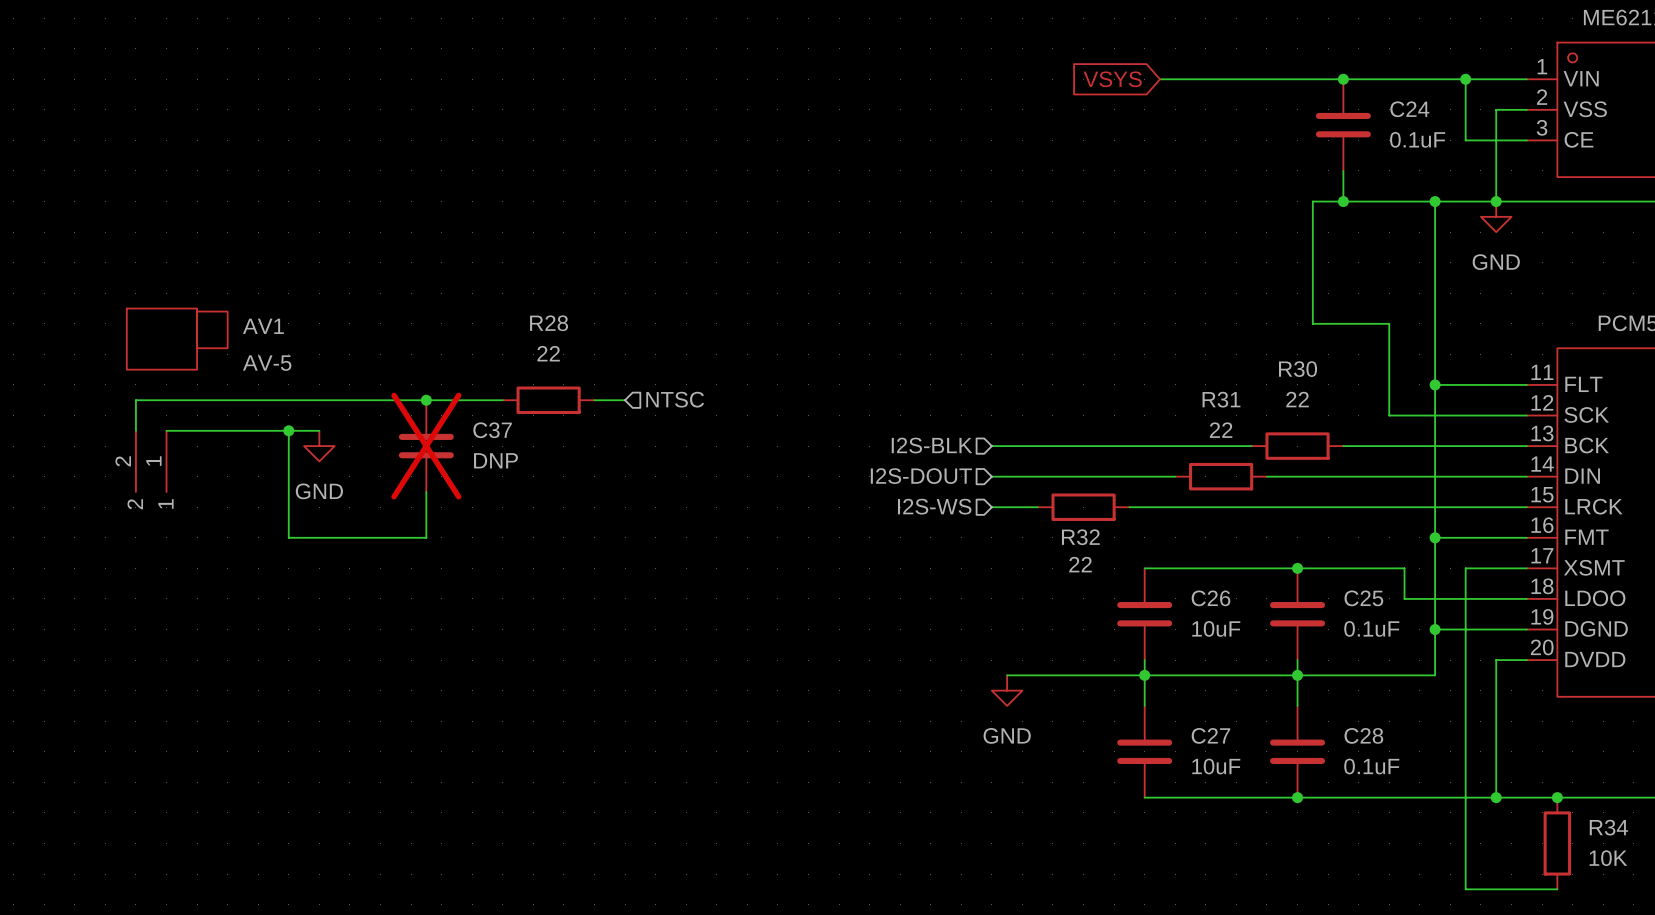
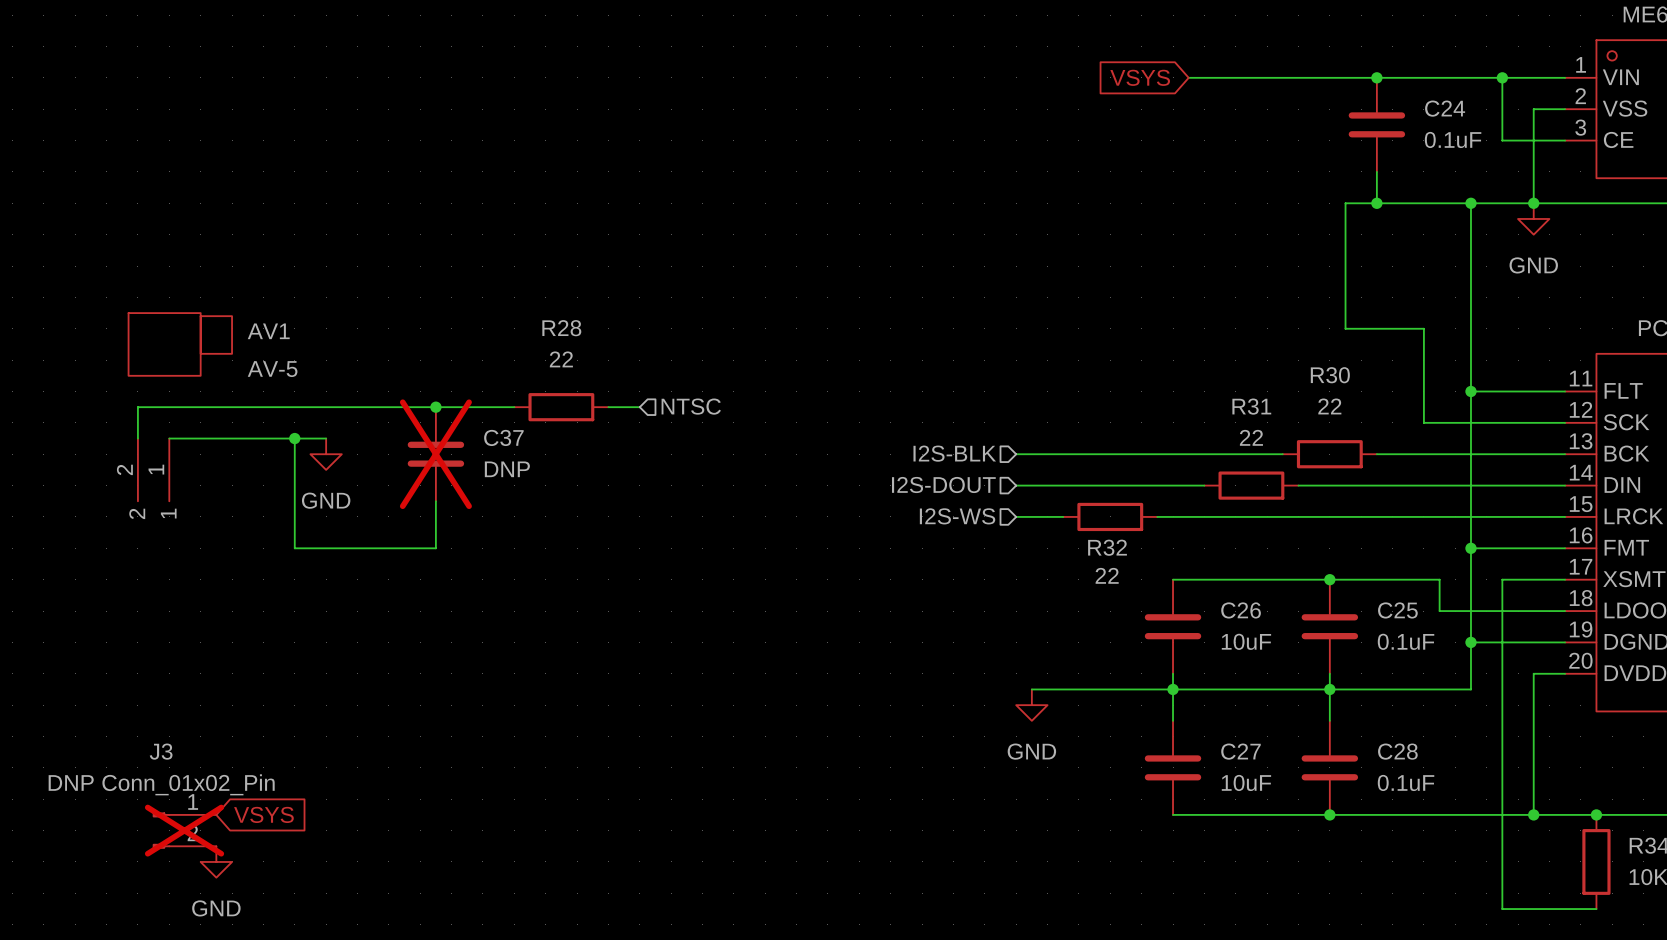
global label: none -> VSYS (263, 814)
J3: none -> DNP Conn_01x02_Pin (184, 830)
power symbol: none -> GND (216, 861)

